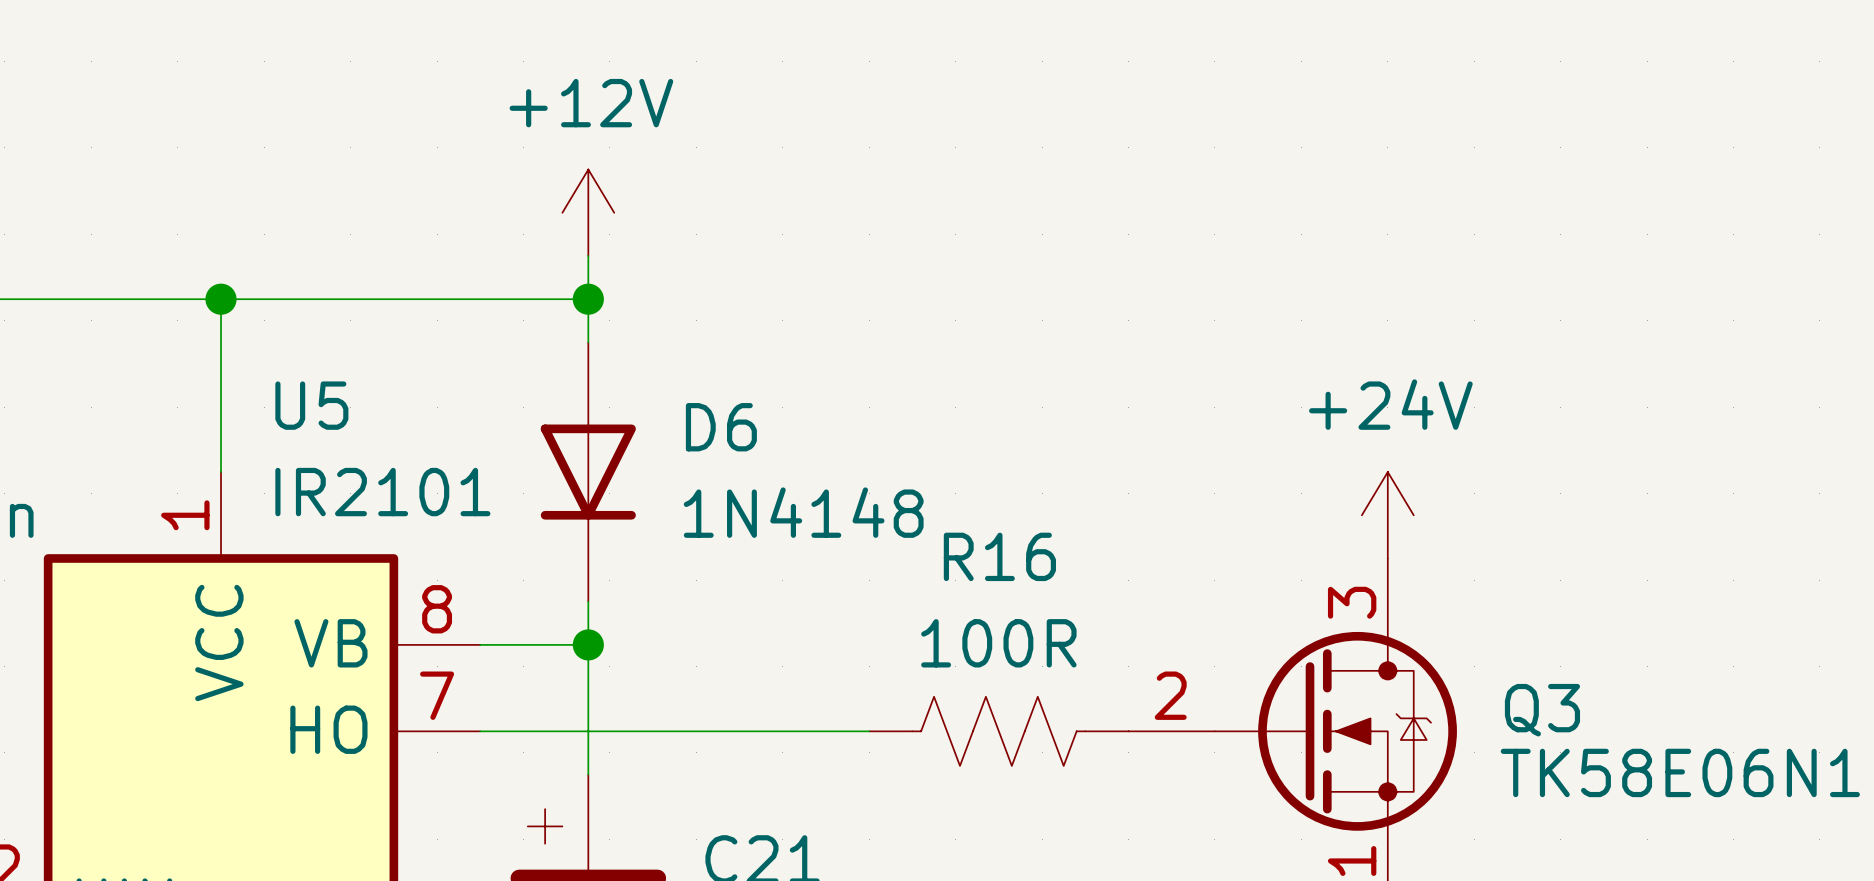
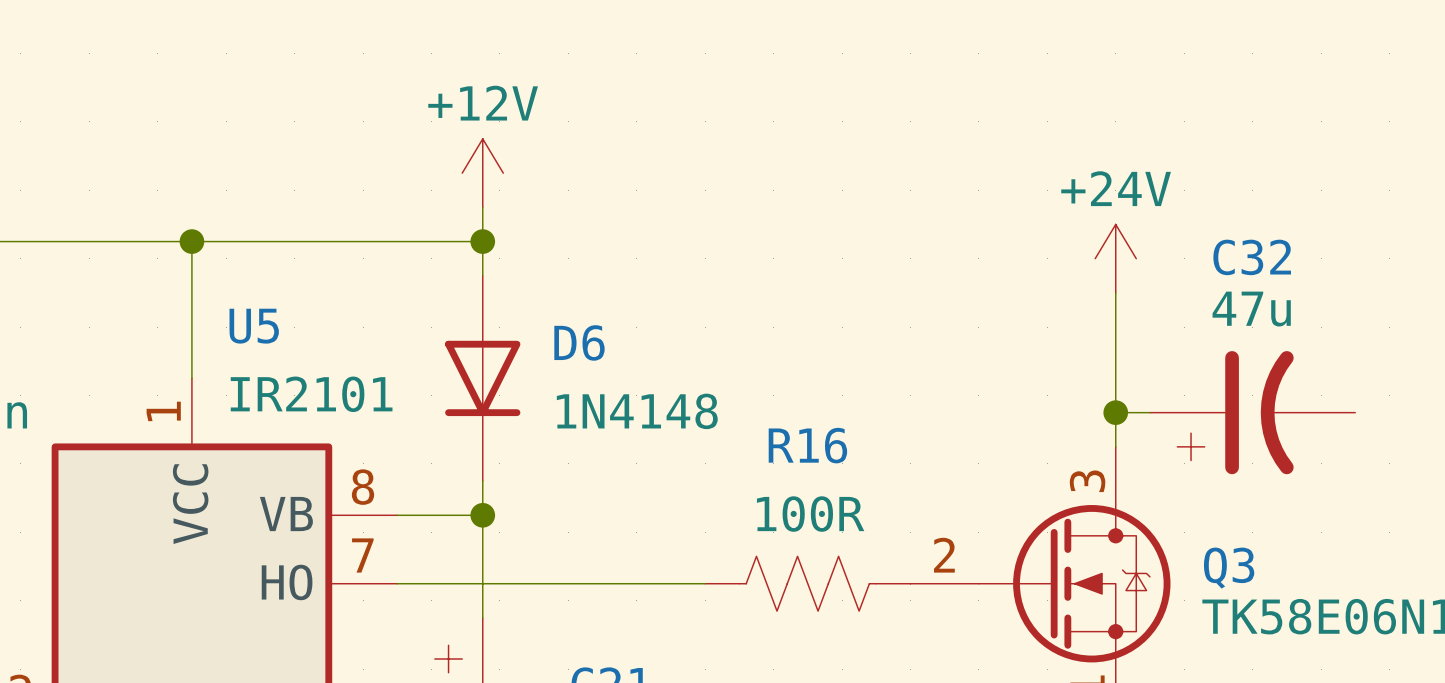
power symbol text position: +12V (591, 103) -> +12V (483, 103)
wire: none -> (1115, 292) (1115, 446)
power symbol text position: +24V (1390, 404) -> +24V (1116, 188)
wire: none -> (1115, 412) (1149, 412)
junction: none -> (1115, 412)
power symbol position: +24V (1387, 515) -> +24V (1115, 258)
C32: none -> 47u (1252, 412)

